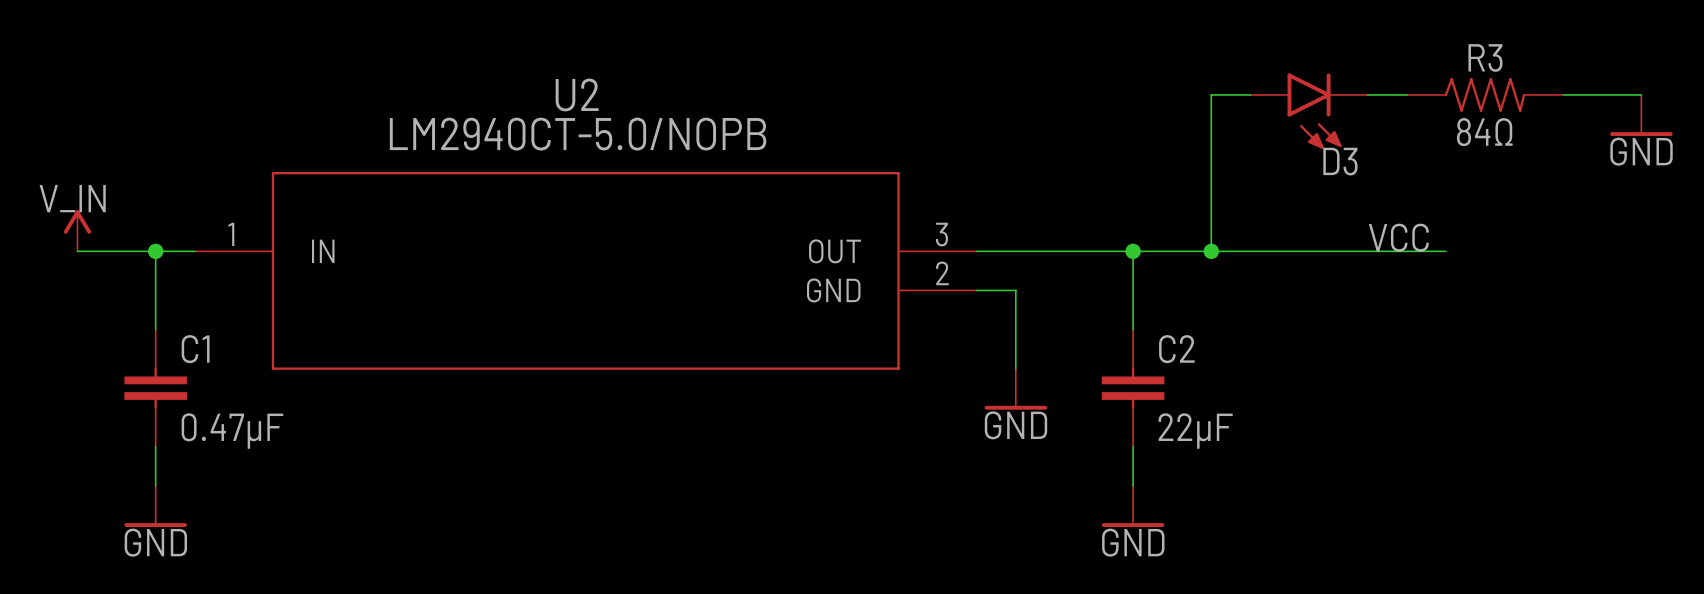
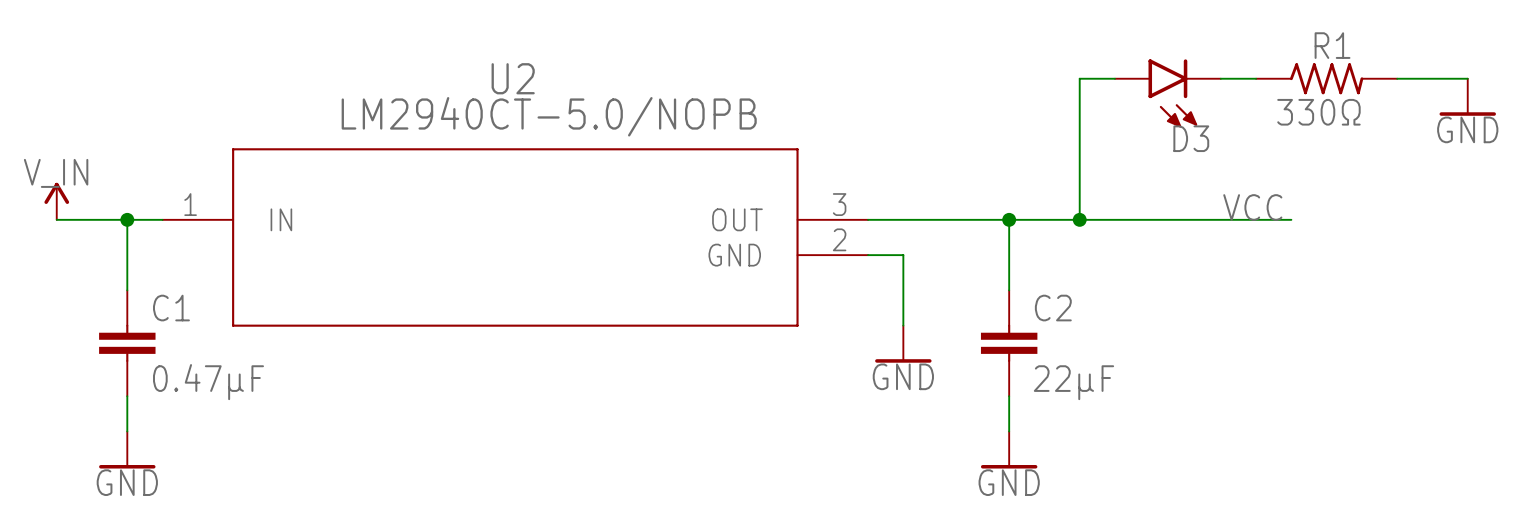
R3: 84Ω (1484, 94) -> none
R1: none -> 330Ω (1326, 78)

